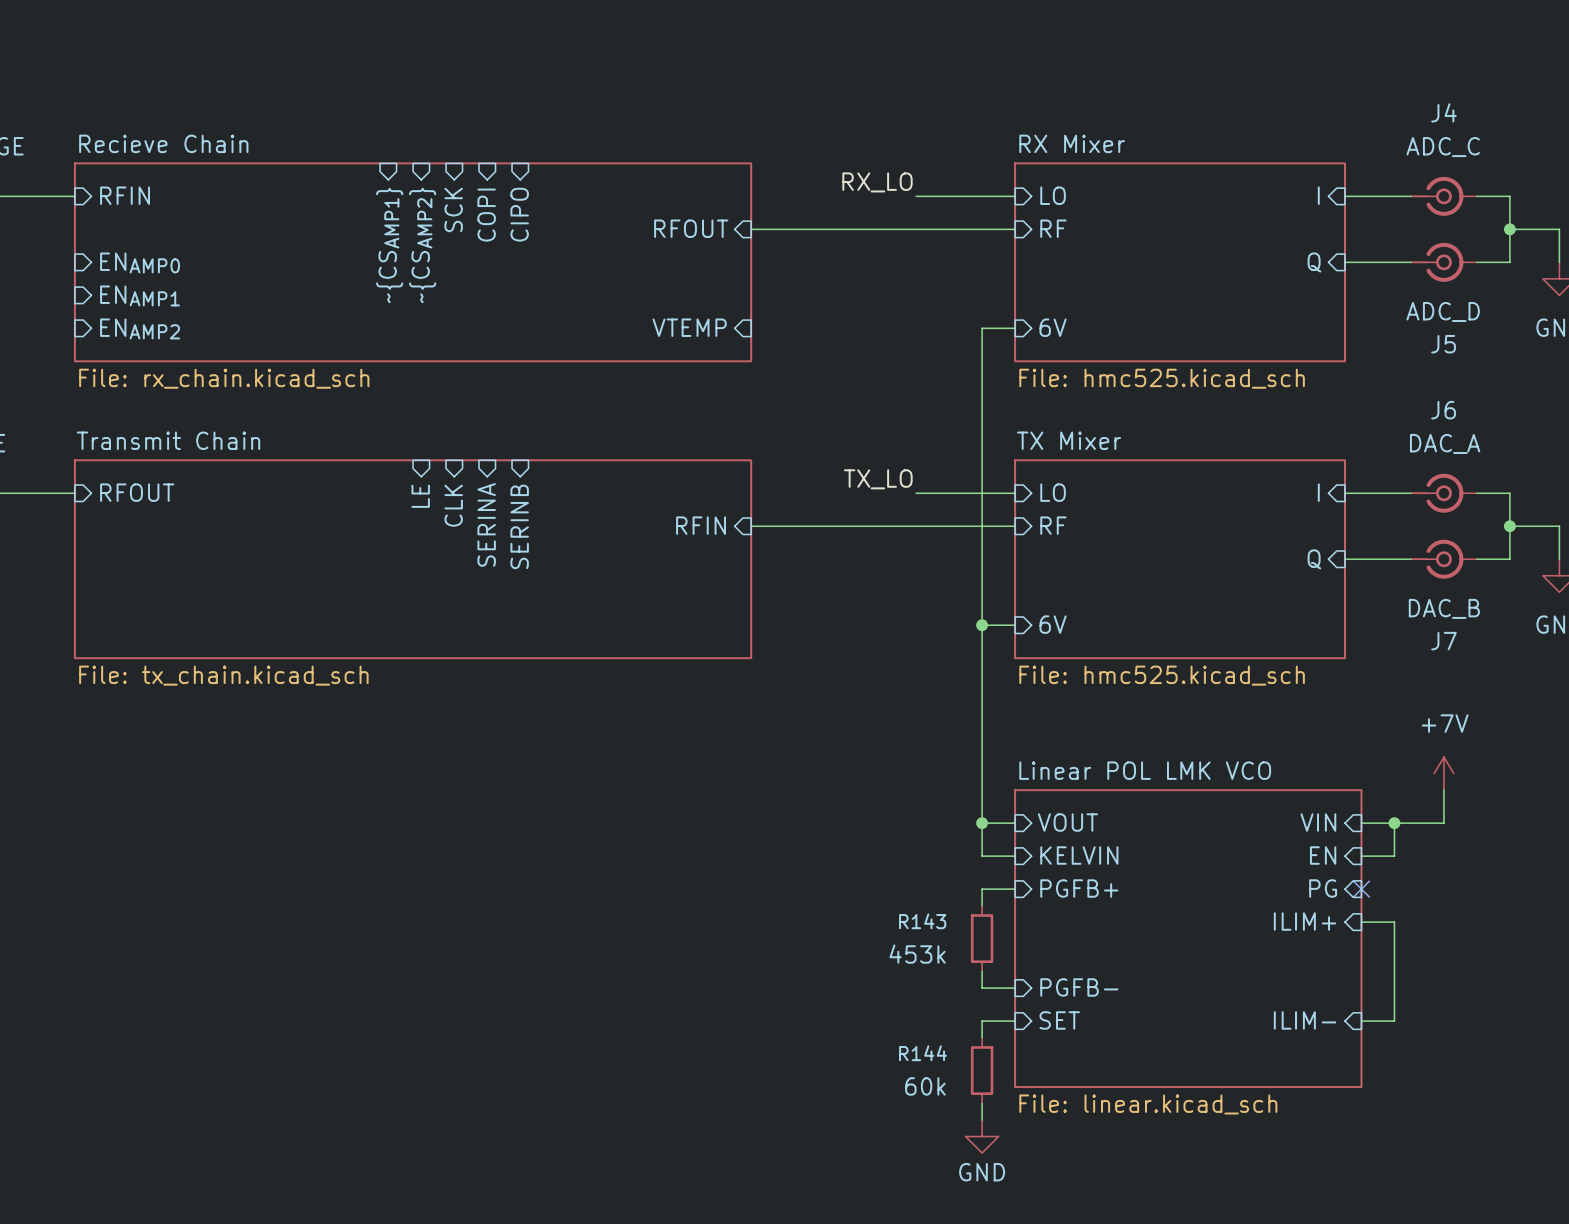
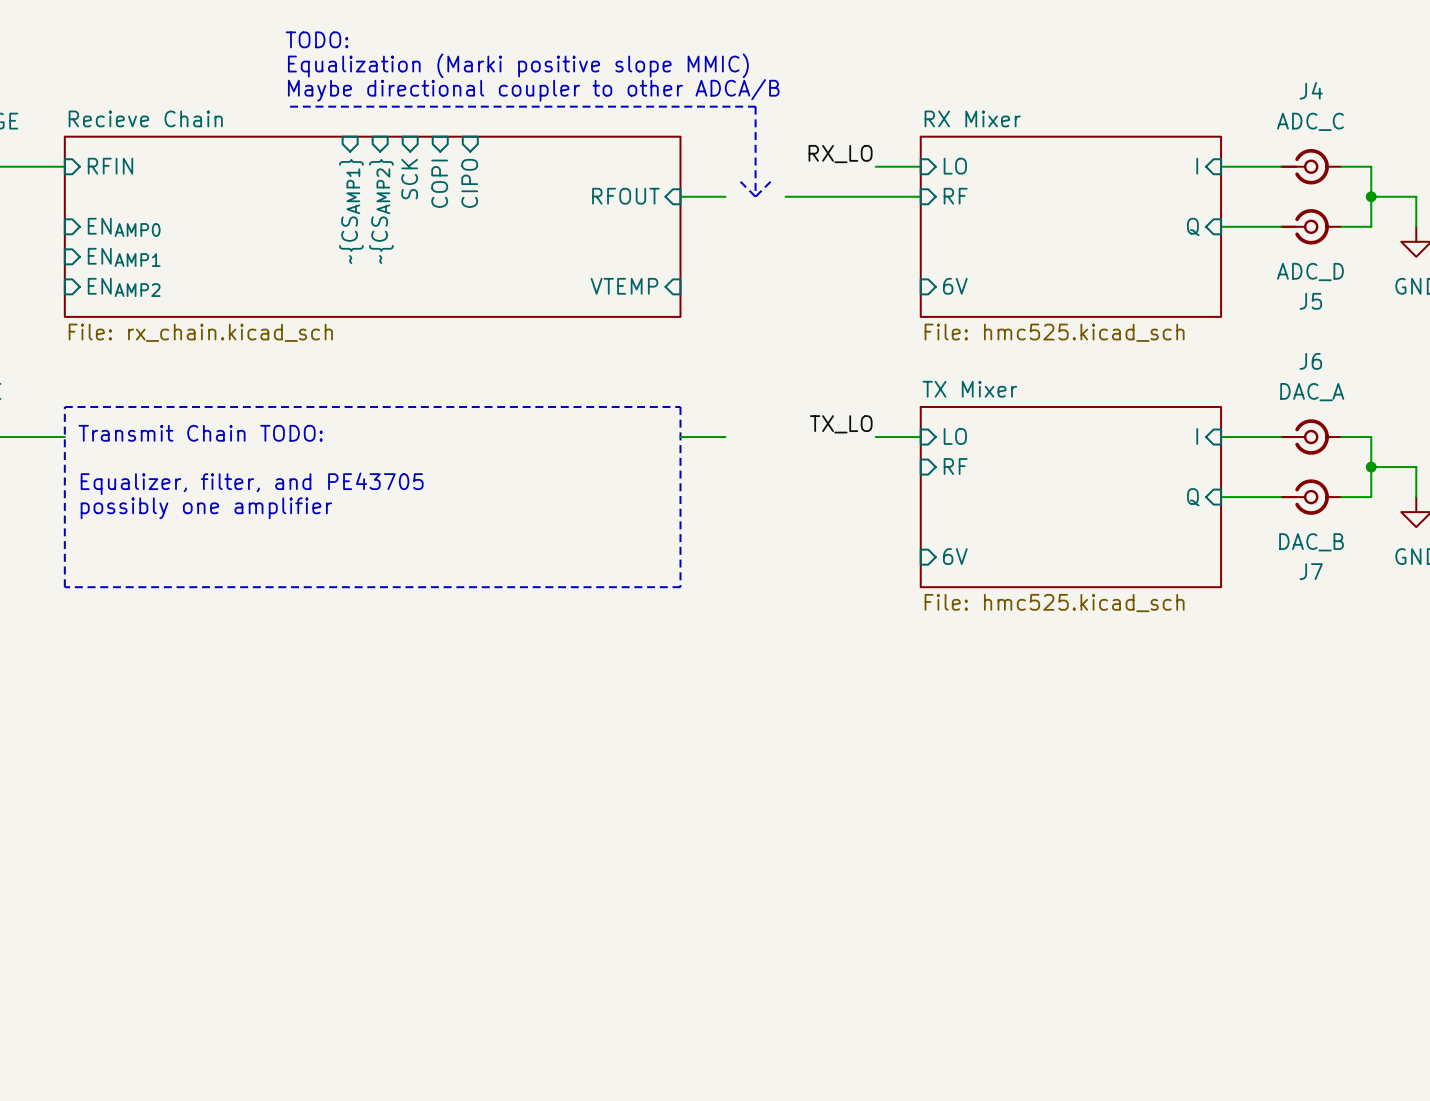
text: none -> TODO: (317, 39)
text: none -> Equalization (Marki positive slope MMIC) (518, 65)
text: none -> Maybe directional coupler to other ADCA/B (533, 90)
line: none -> (290, 106) (755, 106) (755, 196)
label position: RX_LO (877, 182) -> RX_LO (840, 154)
wire: (916, 196) (965, 196) -> none
line: none -> (740, 181) (755, 196)
line: none -> (770, 181) (755, 196)
wire: (800, 229) (866, 229) -> none
wire: (1015, 328) (982, 328) (982, 856) (1015, 856) -> none
line: none -> (64, 406) (680, 406) (680, 587) (64, 587) (64, 406)
label position: TX_LO (878, 479) -> TX_LO (841, 424)
text: none -> Transmit Chain TODO: (200, 433)
sheet pin: RFOUT (137, 492) -> none
wire: (916, 493) (965, 493) -> (680, 437) (725, 437)
sheet pin: LE (420, 496) -> none
sheet pin: CLK (453, 505) -> none
sheet pin: SERINA (486, 524) -> none
sheet pin: RFIN (701, 525) -> none
sheet pin: SERINB (519, 526) -> none
wire: (751, 526) (1015, 526) -> none
text: none -> Equalizer, filter, and PE43705 (252, 483)
sheet Transmit Chain: File: tx_chain.kicad_sch (413, 559) -> none
text: none -> possibly one amplifier (206, 508)
wire: (982, 625) (1015, 625) -> none
junction: (982, 625) -> none
power symbol: +7V (1443, 773) -> none
wire: (1443, 790) (1443, 823) (1361, 823) -> none
sheet pin: VOUT (1067, 822) -> none
sheet pin: VIN (1318, 822) -> none
wire: (982, 823) (1015, 823) -> none
junction: (982, 823) -> none
wire: (1394, 823) (1394, 856) (1361, 856) -> none
junction: (1394, 823) -> none
sheet pin: KELVIN (1079, 855) -> none
sheet pin: EN (1323, 855) -> none
sheet pin: PGFB+ (1079, 888) -> none
sheet pin: PG (1323, 888) -> none
wire: (1015, 889) (982, 889) (982, 905) -> none
no-connect mark: (1361, 889) -> none
sheet pin: ILIM+ (1305, 921) -> none
wire: (1361, 922) (1394, 922) (1394, 1021) (1361, 1021) -> none
R143: 453k (982, 938) -> none
sheet Linear POL LMK VCO: File: linear.kicad_sch (1188, 938) -> none
wire: (982, 971) (982, 988) (1015, 988) -> none
sheet pin: PGFB- (1079, 987) -> none
sheet pin: SET (1059, 1020) -> none
sheet pin: ILIM- (1305, 1020) -> none
wire: (1015, 1021) (982, 1021) (982, 1037) -> none
R144: 60k (982, 1070) -> none
wire: (982, 1103) (982, 1120) -> none
power symbol: GND (982, 1136) -> none

